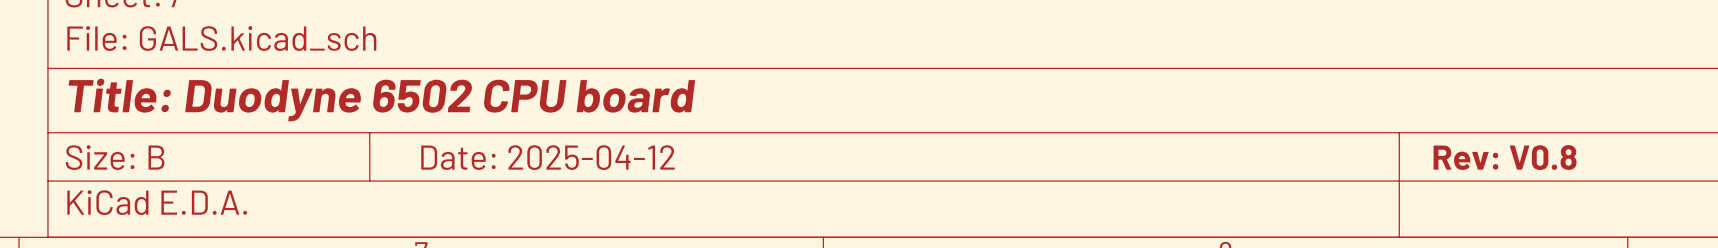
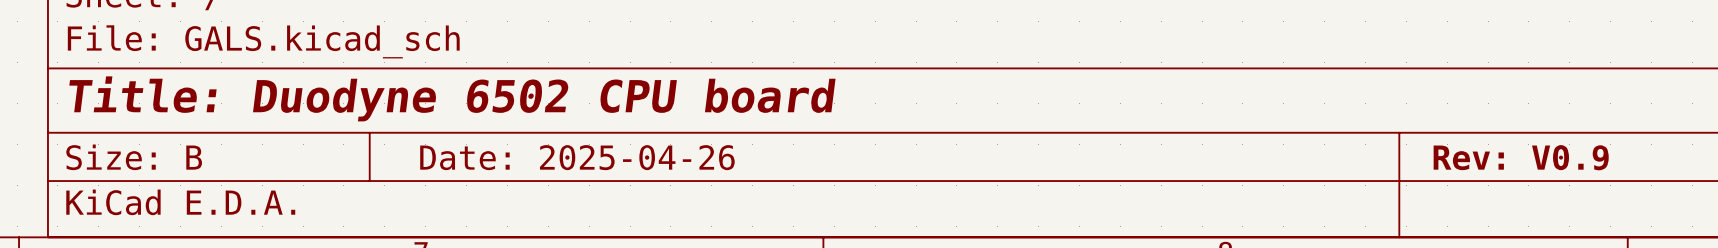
title block: Date: 2025-04-12 (547, 157) -> Date: 2025-04-26 (577, 157)
title block: Rev: V0.8 (1505, 157) -> Rev: V0.9 (1521, 157)

